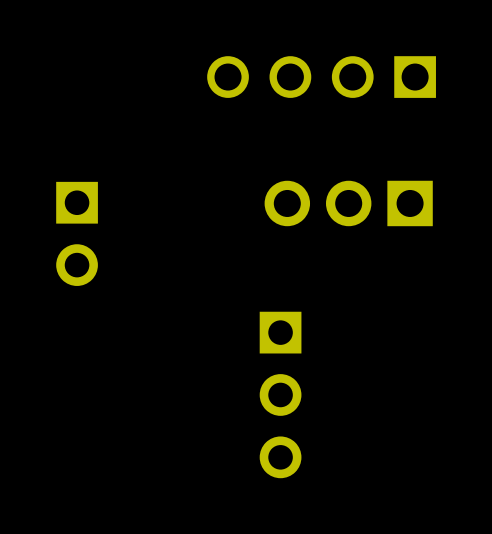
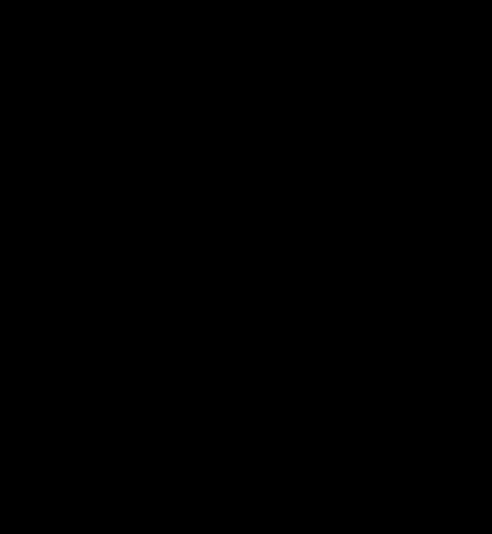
part: (321, 77) -> none
part: (348, 203) -> none
part: (77, 233) -> none
part: (280, 394) -> none

